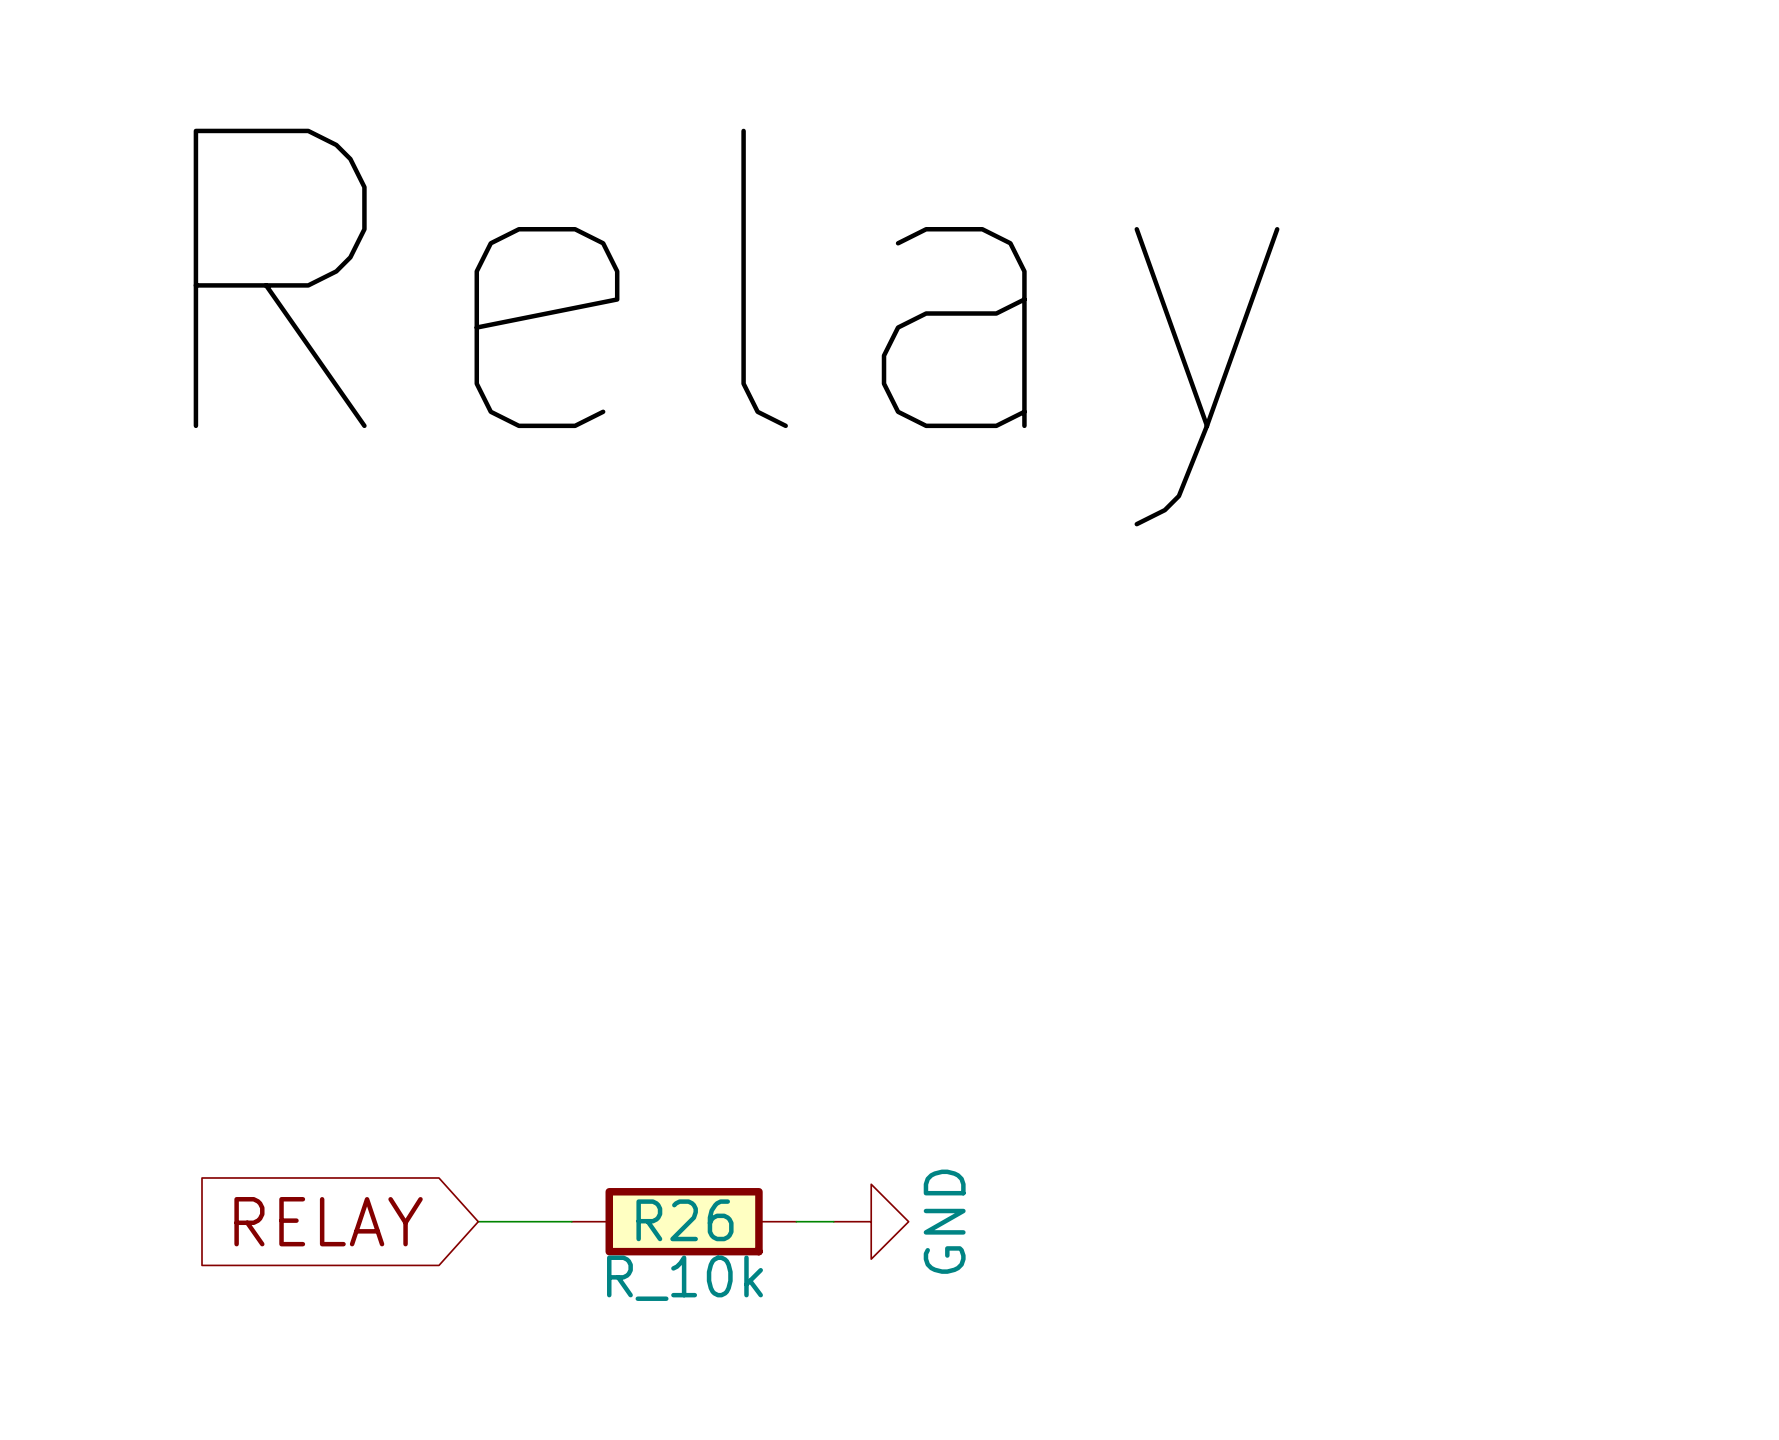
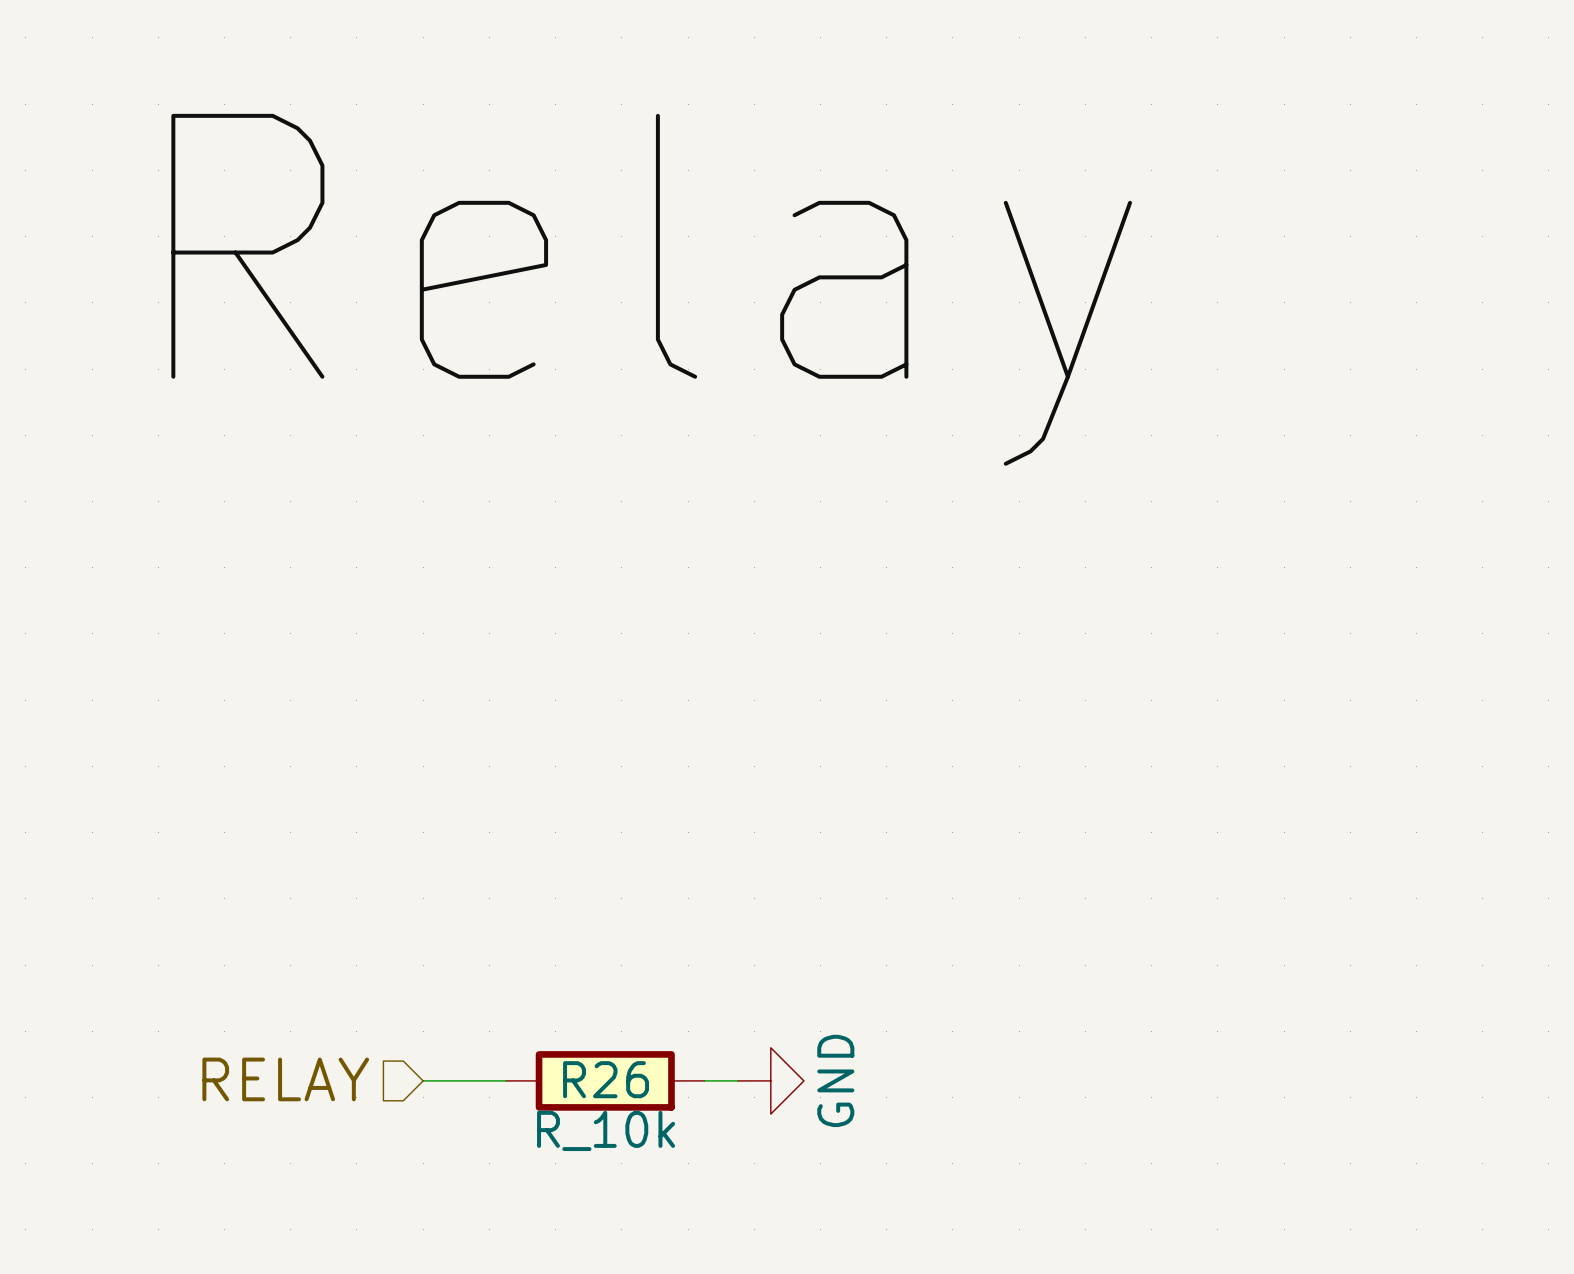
hierarchical label: none -> RELAY (285, 1079)
global label: RELAY (328, 1221) -> none

